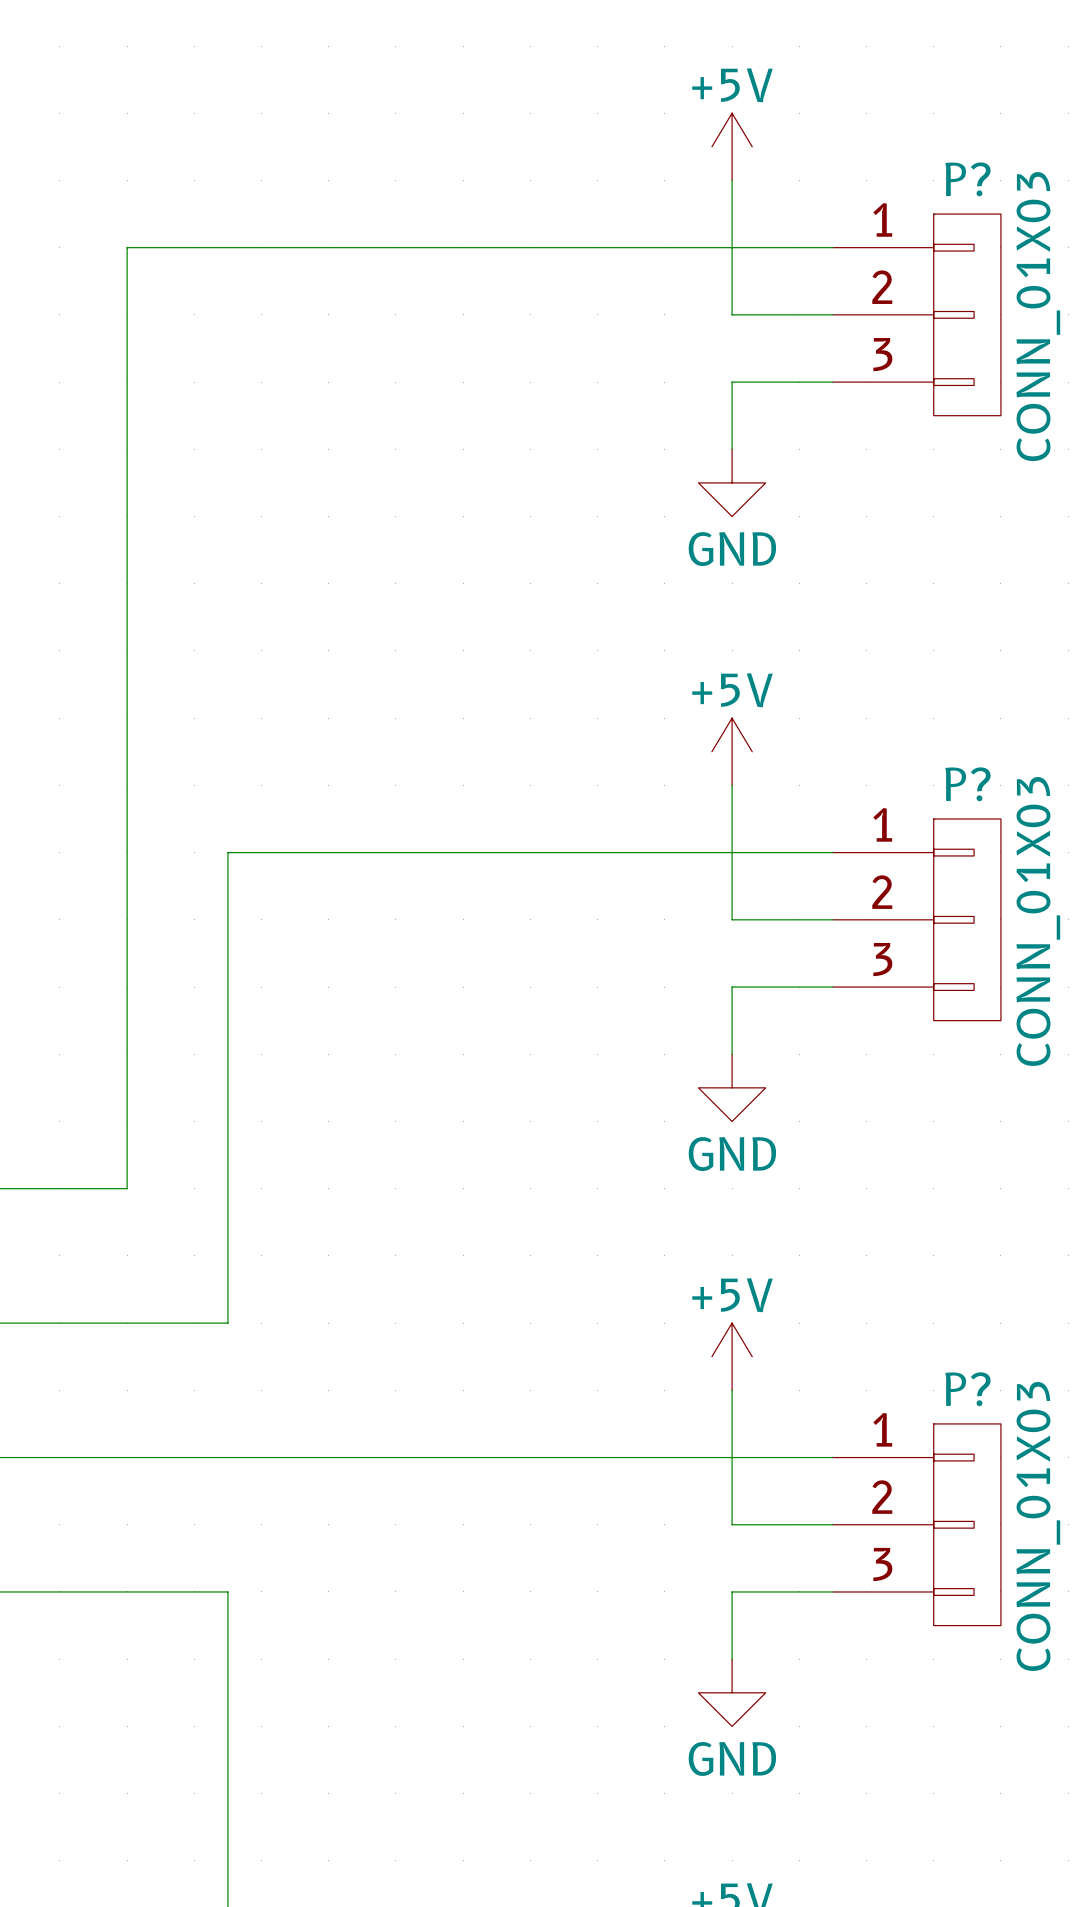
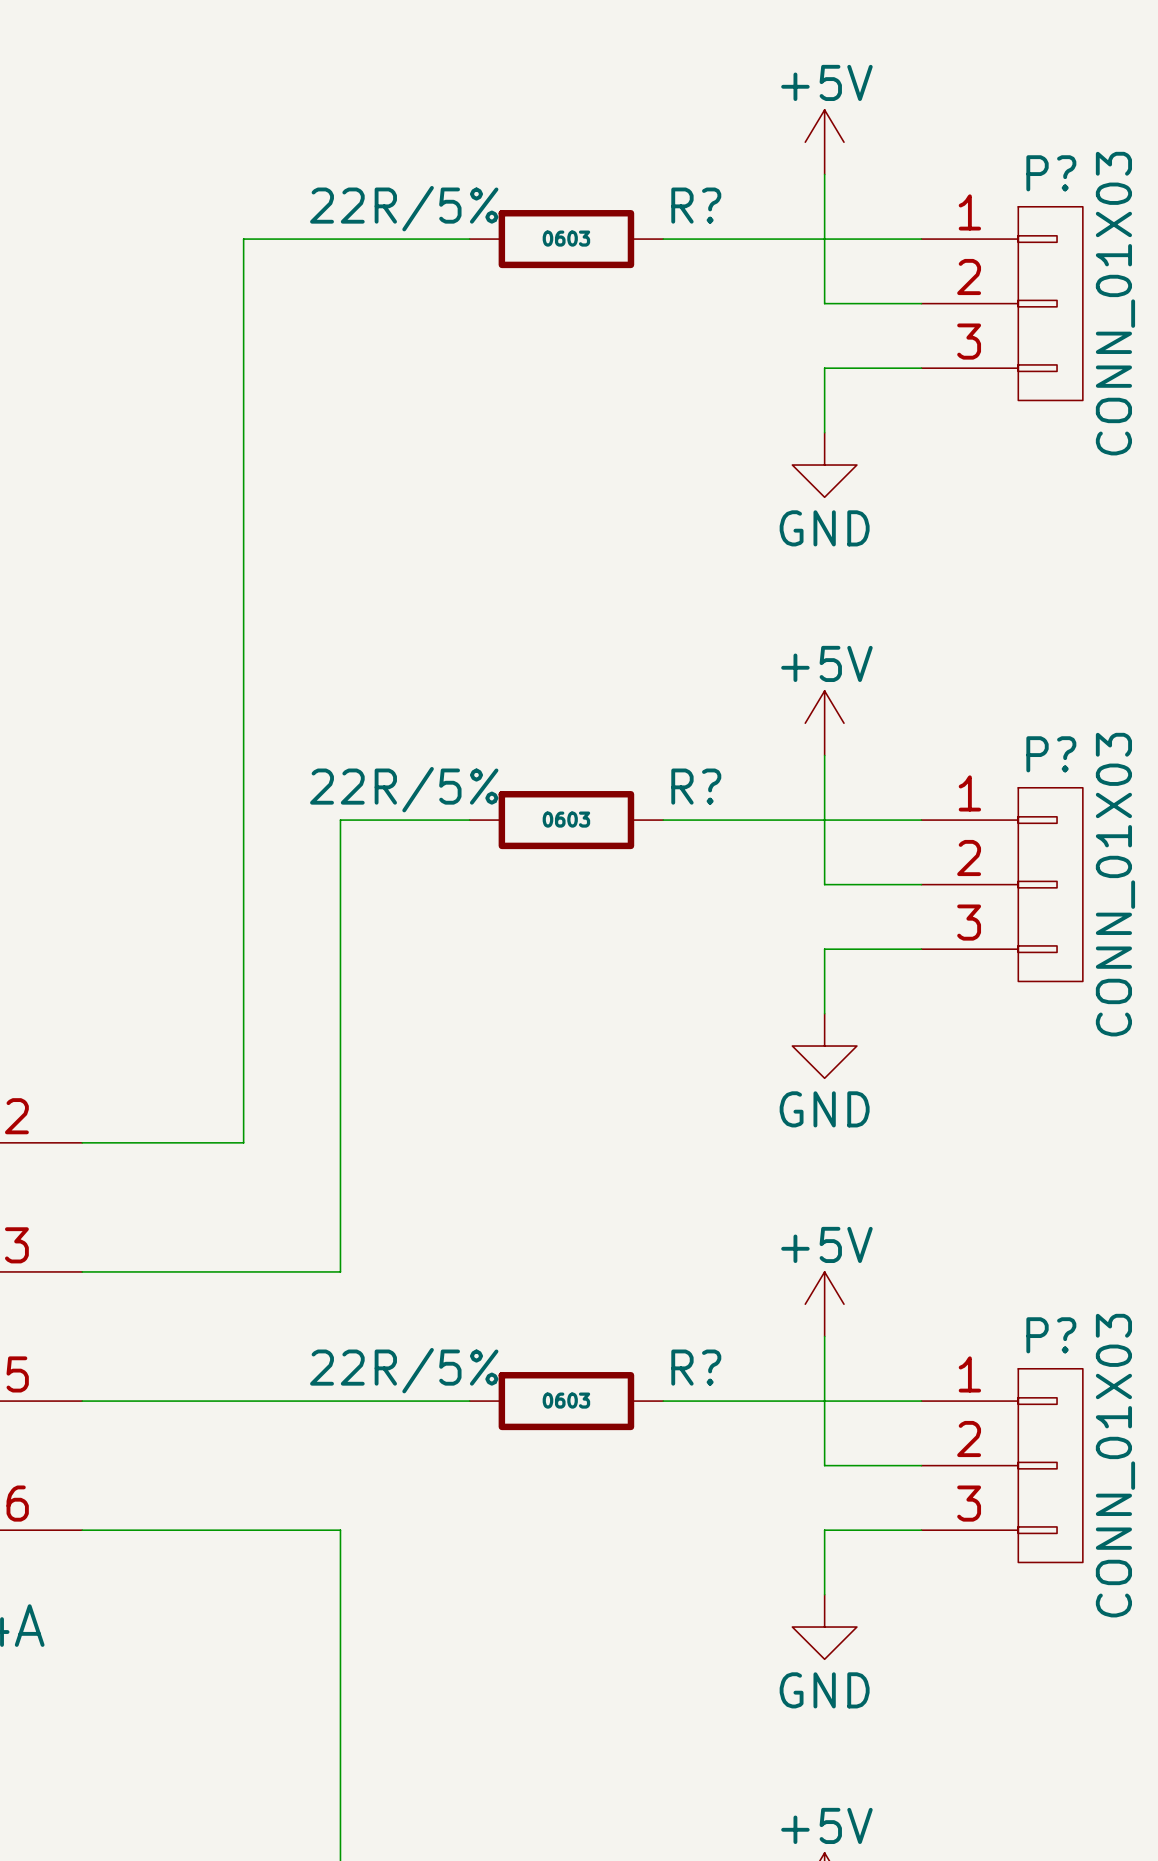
wire: (362, 247) (564, 247) -> none
R?: none -> 22R/5% (566, 239)
wire: (362, 852) (564, 852) -> none
R?: none -> 22R/5% (566, 820)
wire: (362, 1457) (564, 1457) -> none
R?: none -> 22R/5% (566, 1401)

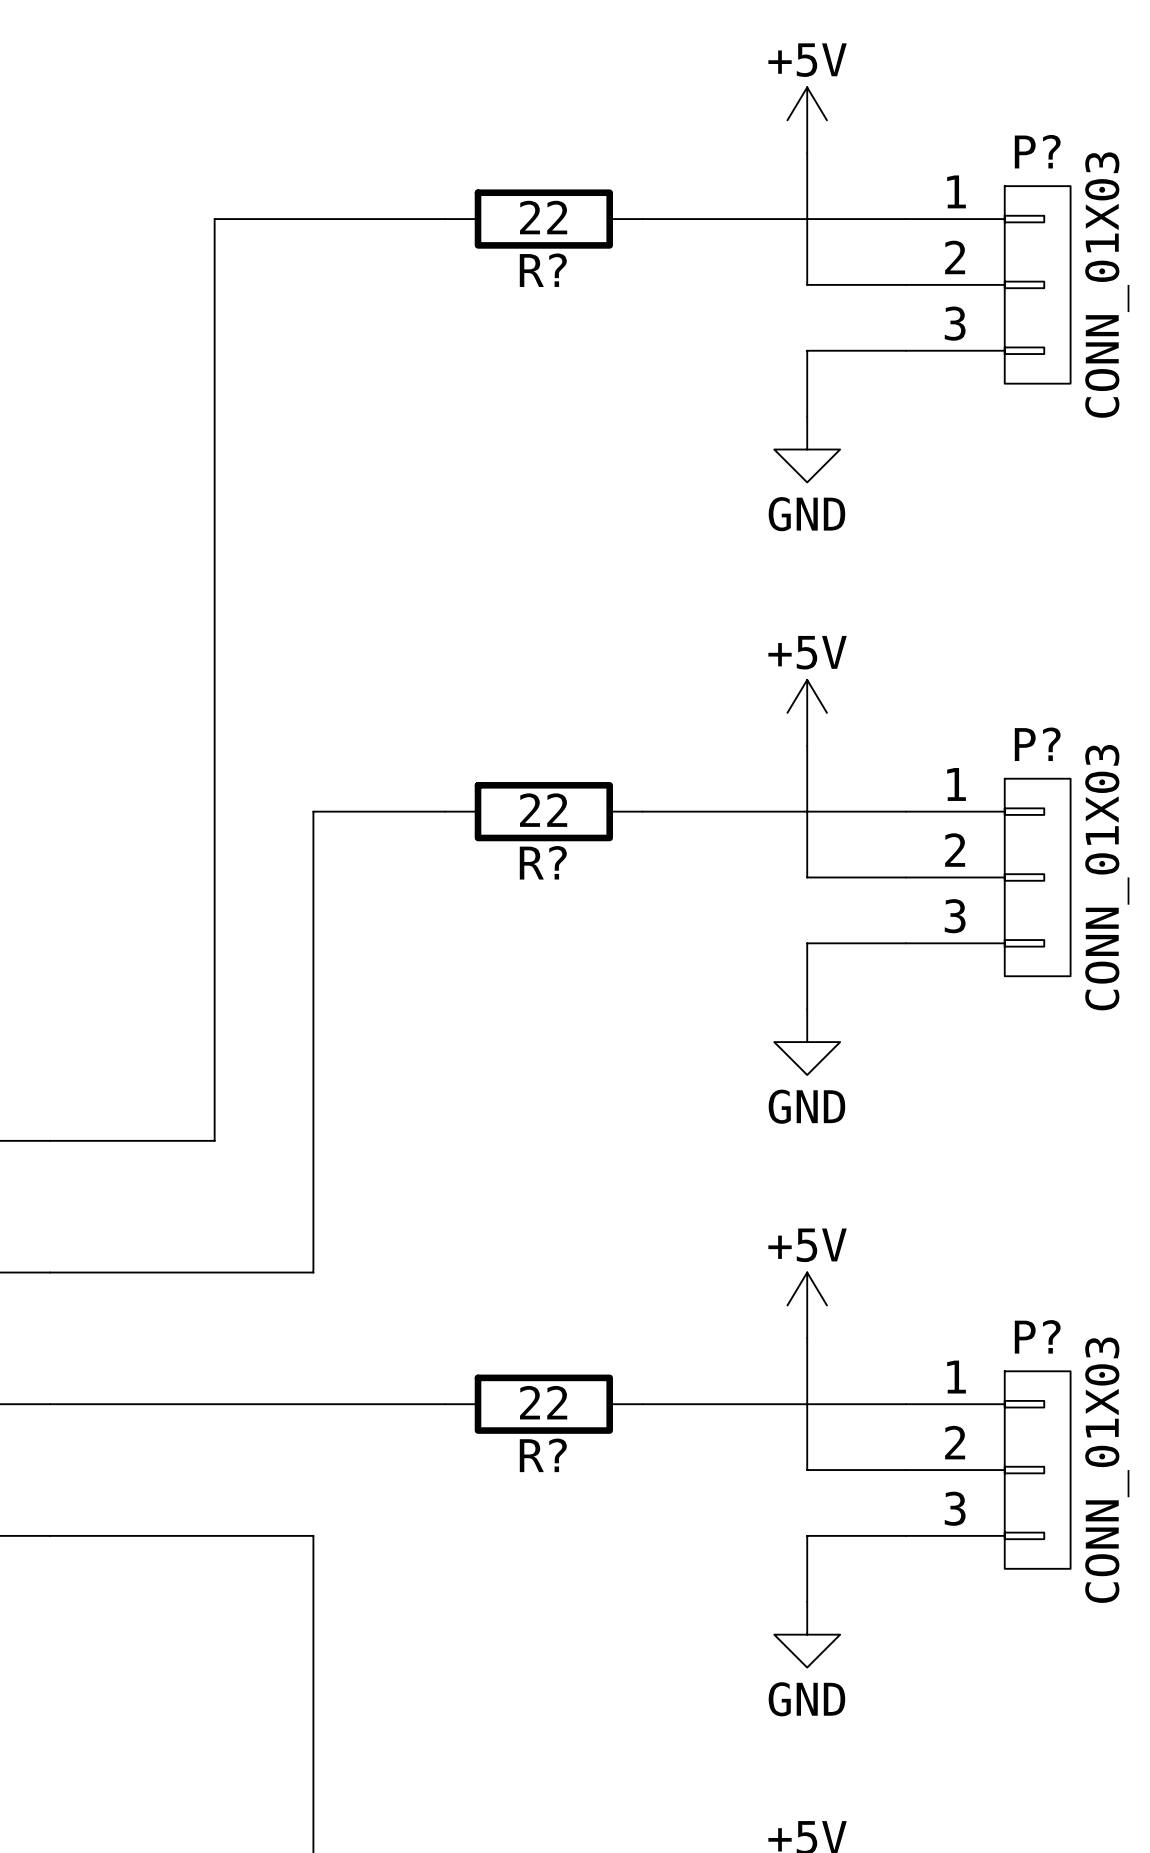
R? name position: R? (696, 205) -> R? (543, 270)
R? value: 22R/5% (404, 208) -> 22 (543, 217)
R? text: 0603 (566, 238) -> none
R? name position: R? (696, 786) -> R? (543, 862)
R? value: 22R/5% (404, 789) -> 22 (543, 810)
R? text: 0603 (566, 819) -> none
R? name position: R? (696, 1367) -> R? (543, 1455)
R? value: 22R/5% (404, 1370) -> 22 (543, 1402)
R? text: 0603 (566, 1400) -> none

